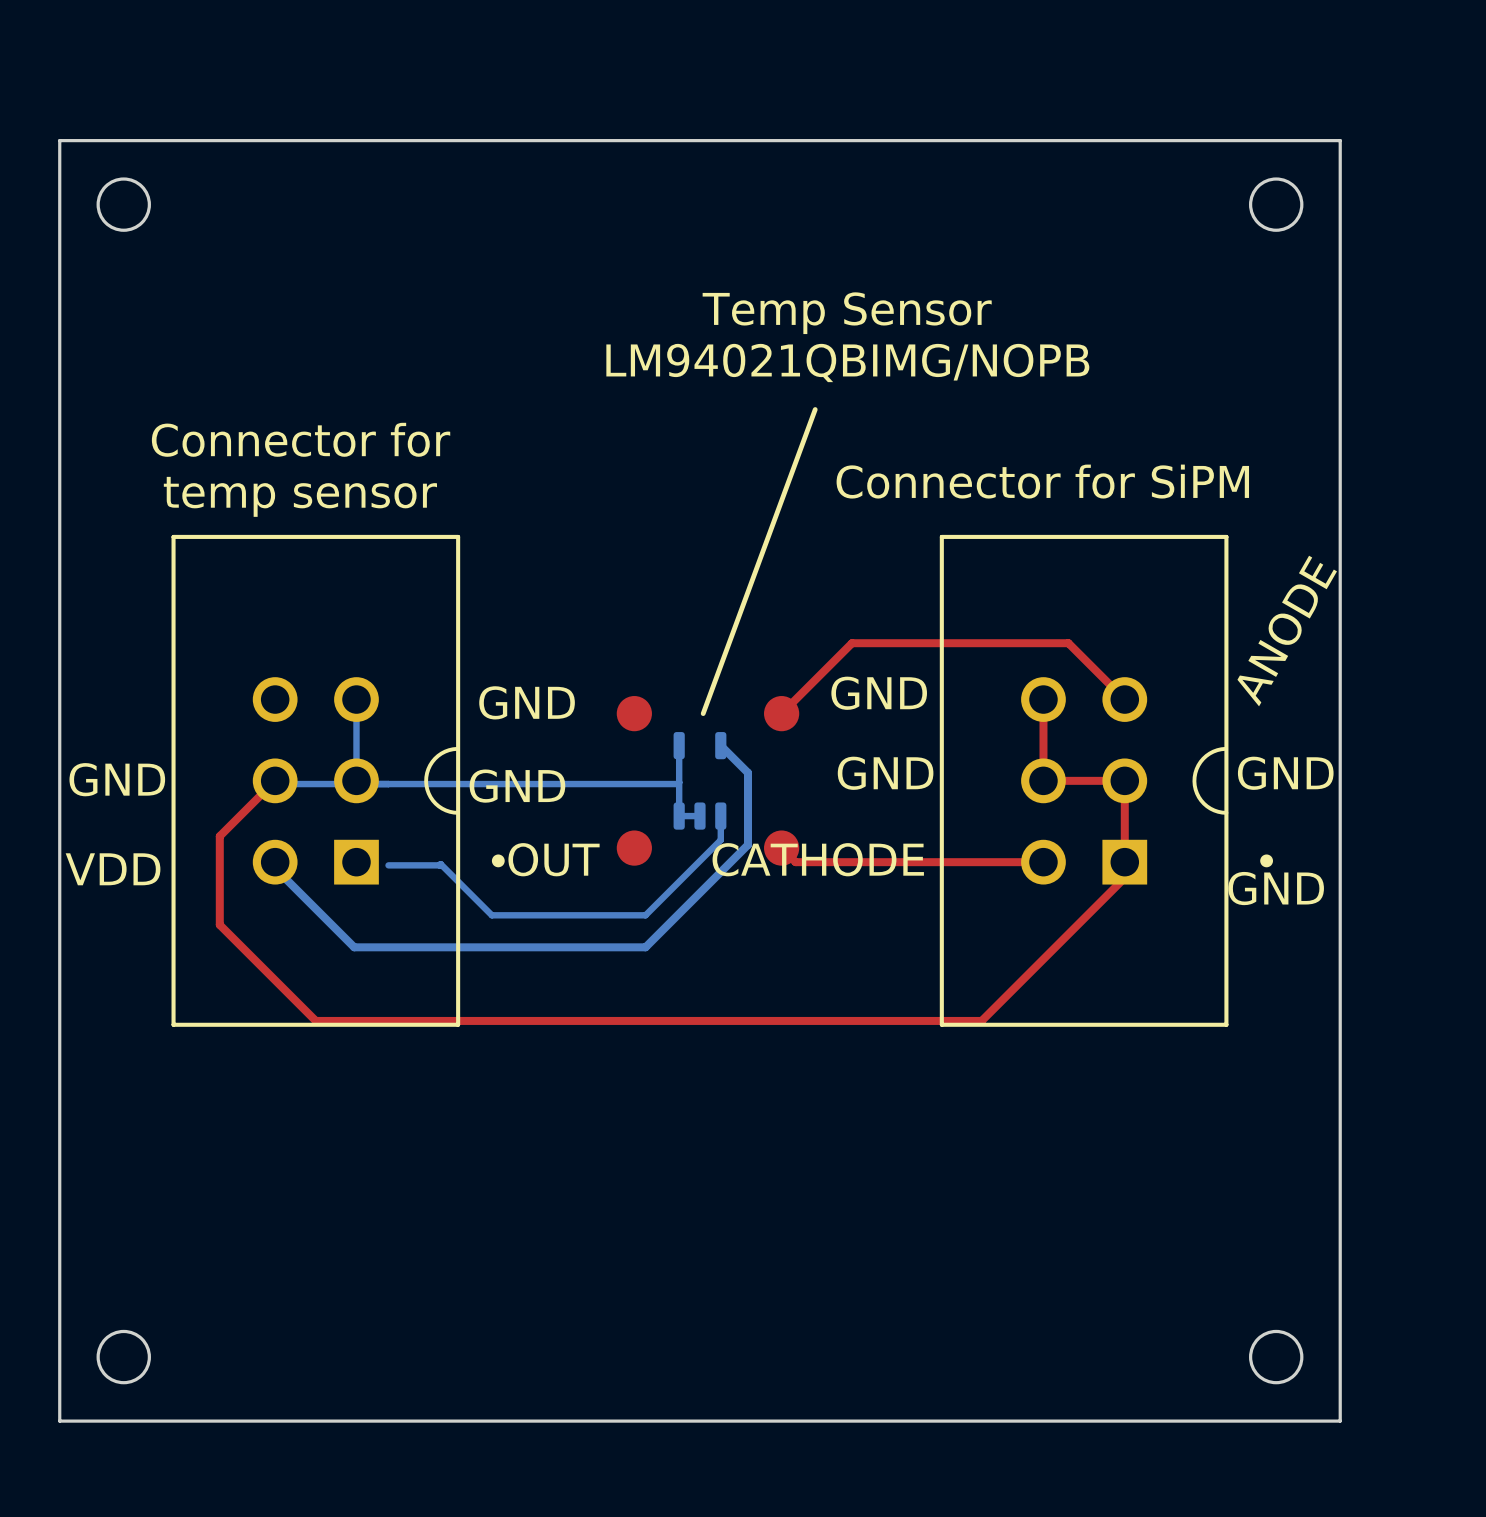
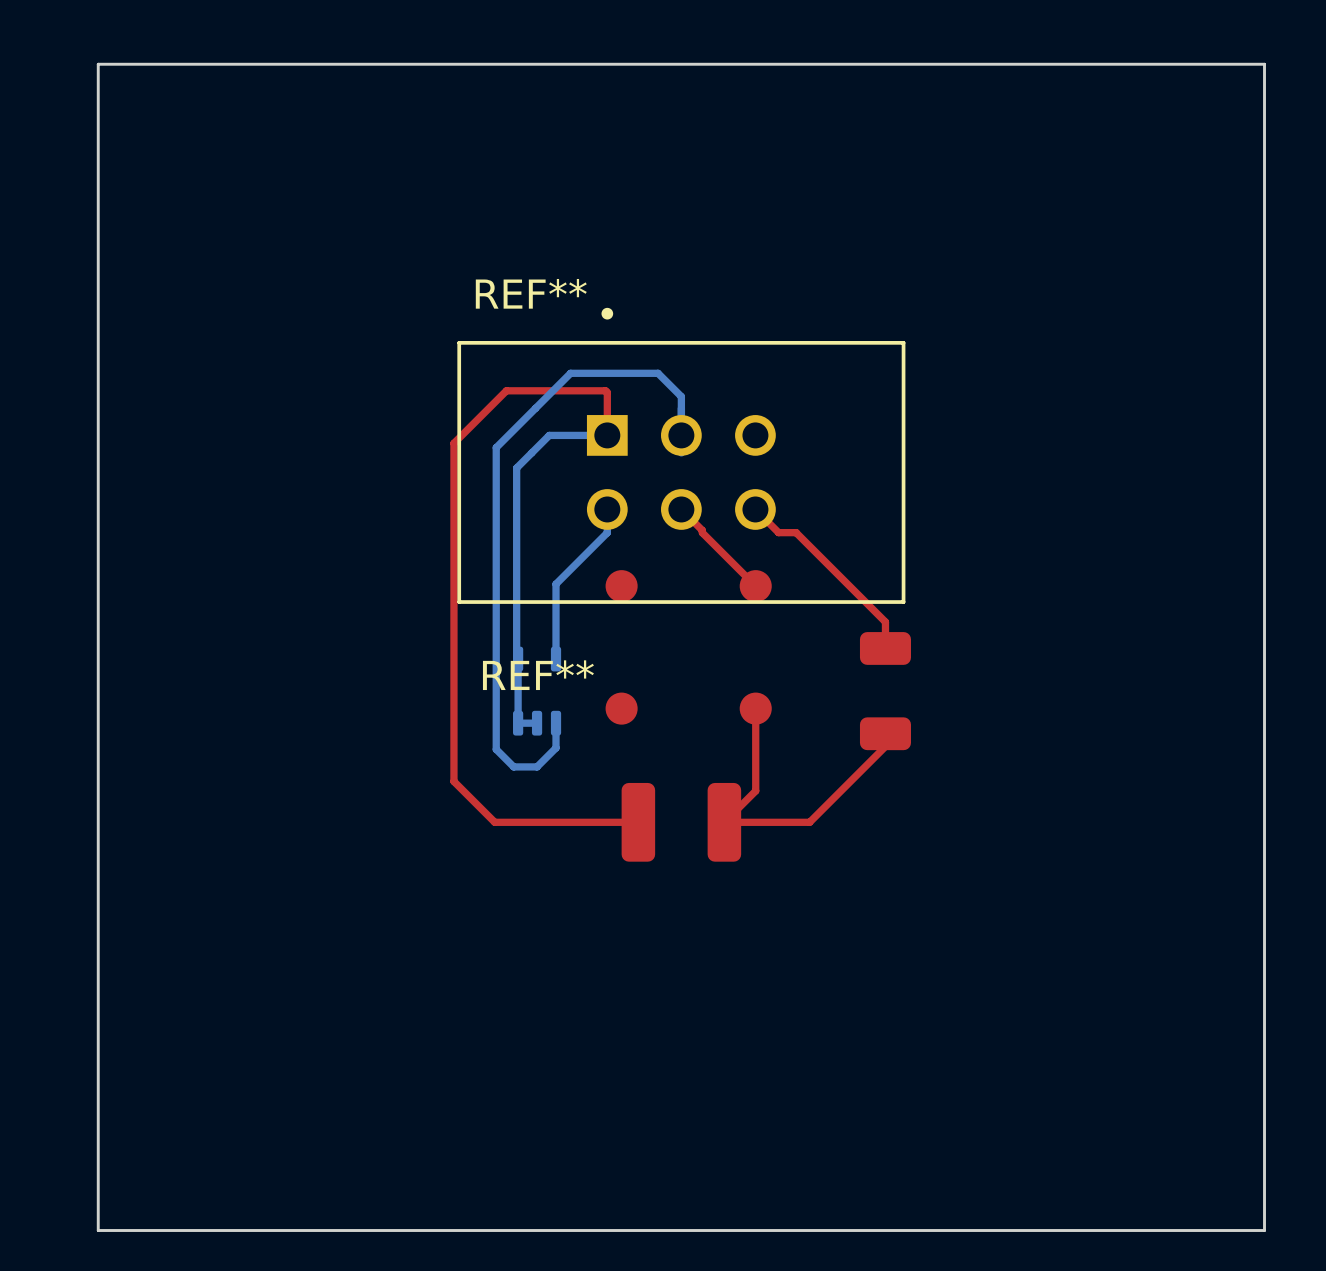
round board edge: [96, 177, 151, 232] -> none
round board edge: [1248, 177, 1304, 232] -> none
text: Temp Sensor (847, 313) -> none
text: LM94021QBIMG/NOPB (847, 363) -> none
line: (815, 409) (703, 713) -> none
text: Connector for (301, 439) -> none
text: Connector for SiPM (1042, 481) -> none
text: temp sensor (300, 496) -> none
top track: none -> (607, 435) (607, 392) (605, 390) (506, 390) (453, 443) (453, 781) (494, 822) (638, 822)
bottom track: none -> (607, 435) (549, 435) (516, 468) (518, 723) (537, 723)
bottom track: none -> (681, 452) (681, 396) (658, 373) (570, 373) (496, 447) (496, 749) (513, 766) (537, 766) (556, 747) (556, 723)
REF**: none -> (681, 455)
bottom track: none -> (607, 509) (607, 532) (556, 584) (556, 659)
top track: none -> (755, 509) (778, 532) (796, 532) (885, 622) (885, 648)
text: ANODE (1287, 631) -> none
text: GND (879, 693) -> none
top track: (1043, 699) (1043, 780) (1124, 780) (1124, 877) (981, 1020) (315, 1020) (219, 924) (219, 836) (275, 780) -> none
top track: (1124, 699) (1068, 643) (852, 643) (781, 713) -> (681, 509) (755, 586)
bottom track: (356, 702) (356, 780) (359, 784) -> none
text: GND (527, 702) -> none
bottom track: (679, 745) (679, 816) (699, 816) -> none
bottom track: (720, 745) (748, 772) (748, 844) (645, 947) (354, 947) (275, 868) (275, 862) -> none
text: GND (885, 773) -> none
text: GND (1285, 773) -> none
text: GND (117, 779) -> none
bottom track: (275, 780) (278, 784) (677, 784) (679, 782) -> none
part: (338, 780) -> none
part: (699, 780) -> none
part: (1106, 780) -> none
text: GND (517, 786) -> none
bottom track: (720, 816) (720, 840) (645, 915) (491, 915) (440, 864) (388, 865) -> none
REF**: none -> (537, 691)
part: none -> (885, 691)
top track: (781, 848) (795, 862) (1043, 862) -> (755, 708) (755, 790) (724, 822) (809, 822) (885, 746)
text: OUT (554, 859) -> none
text: CATHODE (818, 859) -> none
text: VDD (113, 869) -> none
text: GND (1276, 888) -> none
part: none -> (681, 822)
round board edge: [96, 1329, 151, 1385] -> none
round board edge: [1248, 1329, 1304, 1385] -> none

